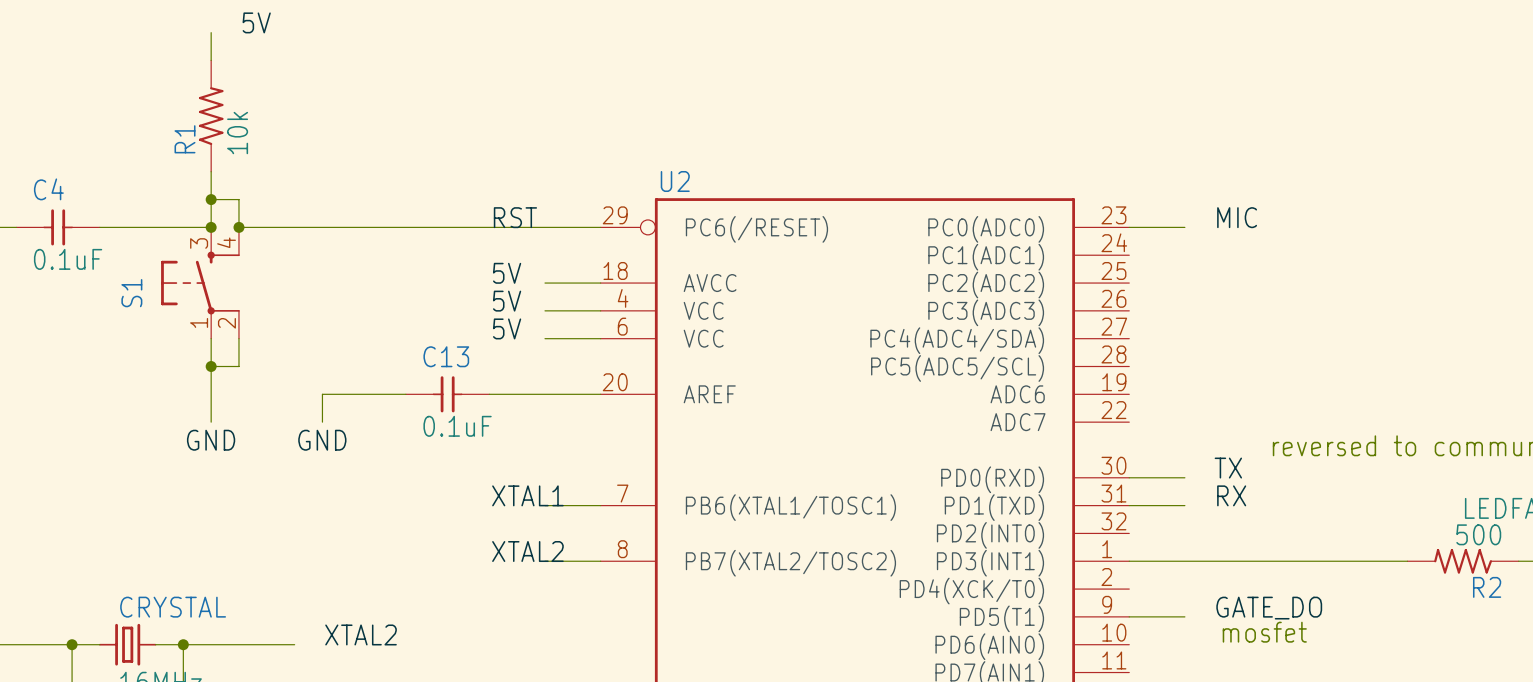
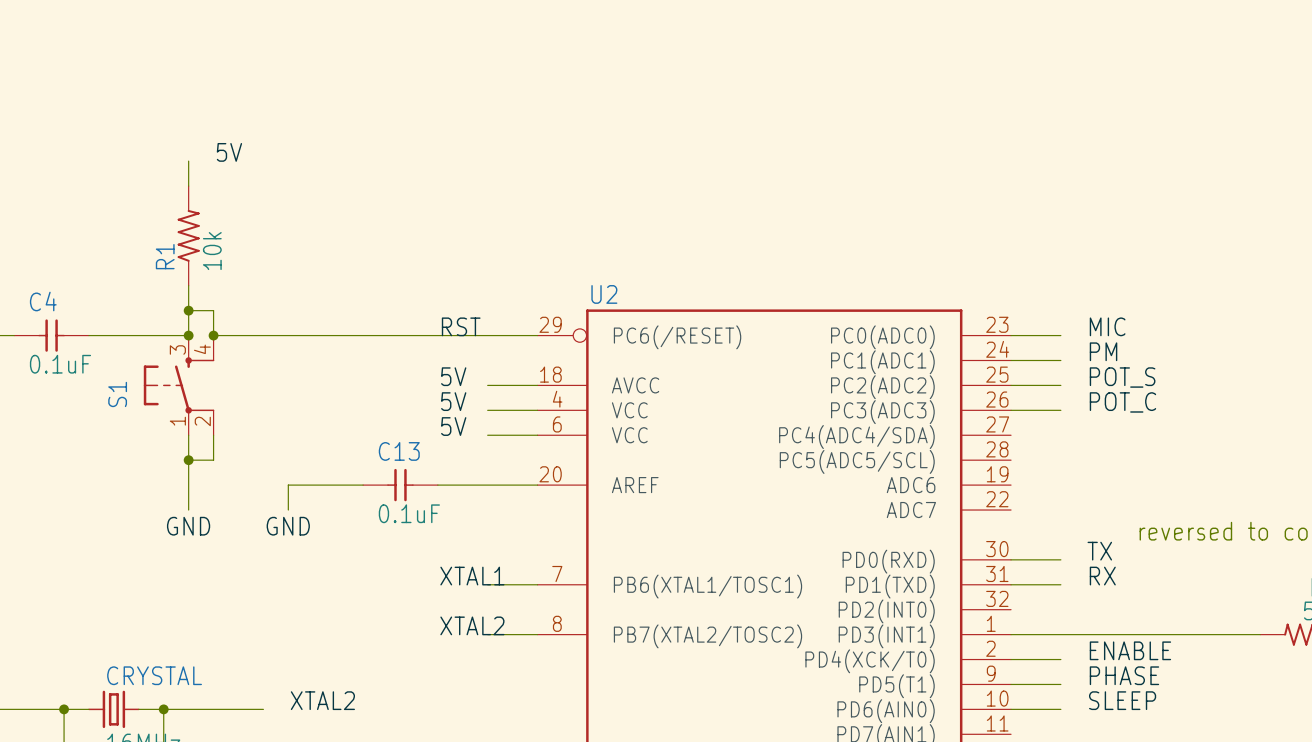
label: none -> PM (1103, 351)
wire: none -> (1011, 360) (1060, 360)
label: none -> POT_S (1122, 377)
wire: none -> (1011, 385) (1060, 385)
label: none -> POT_C (1122, 402)
wire: none -> (1011, 410) (1060, 410)
label: none -> ENABLE (1130, 650)
wire: none -> (1011, 659) (1060, 659)
label: GATE_DO (1269, 608) -> PHASE (1124, 675)
text: mosfet (1264, 632) -> none
label: none -> SLEEP (1122, 700)
wire: none -> (1011, 709) (1060, 709)

